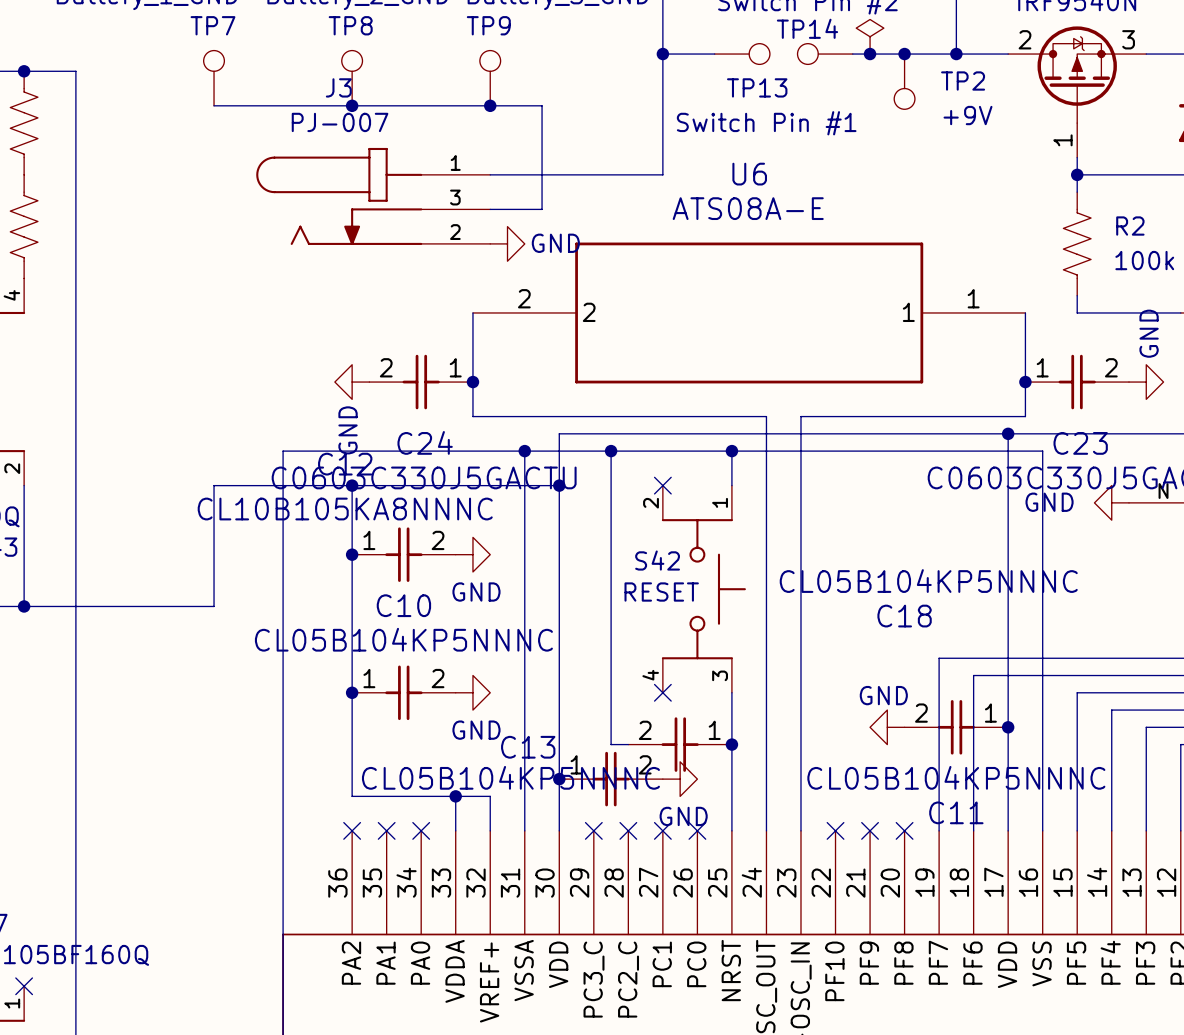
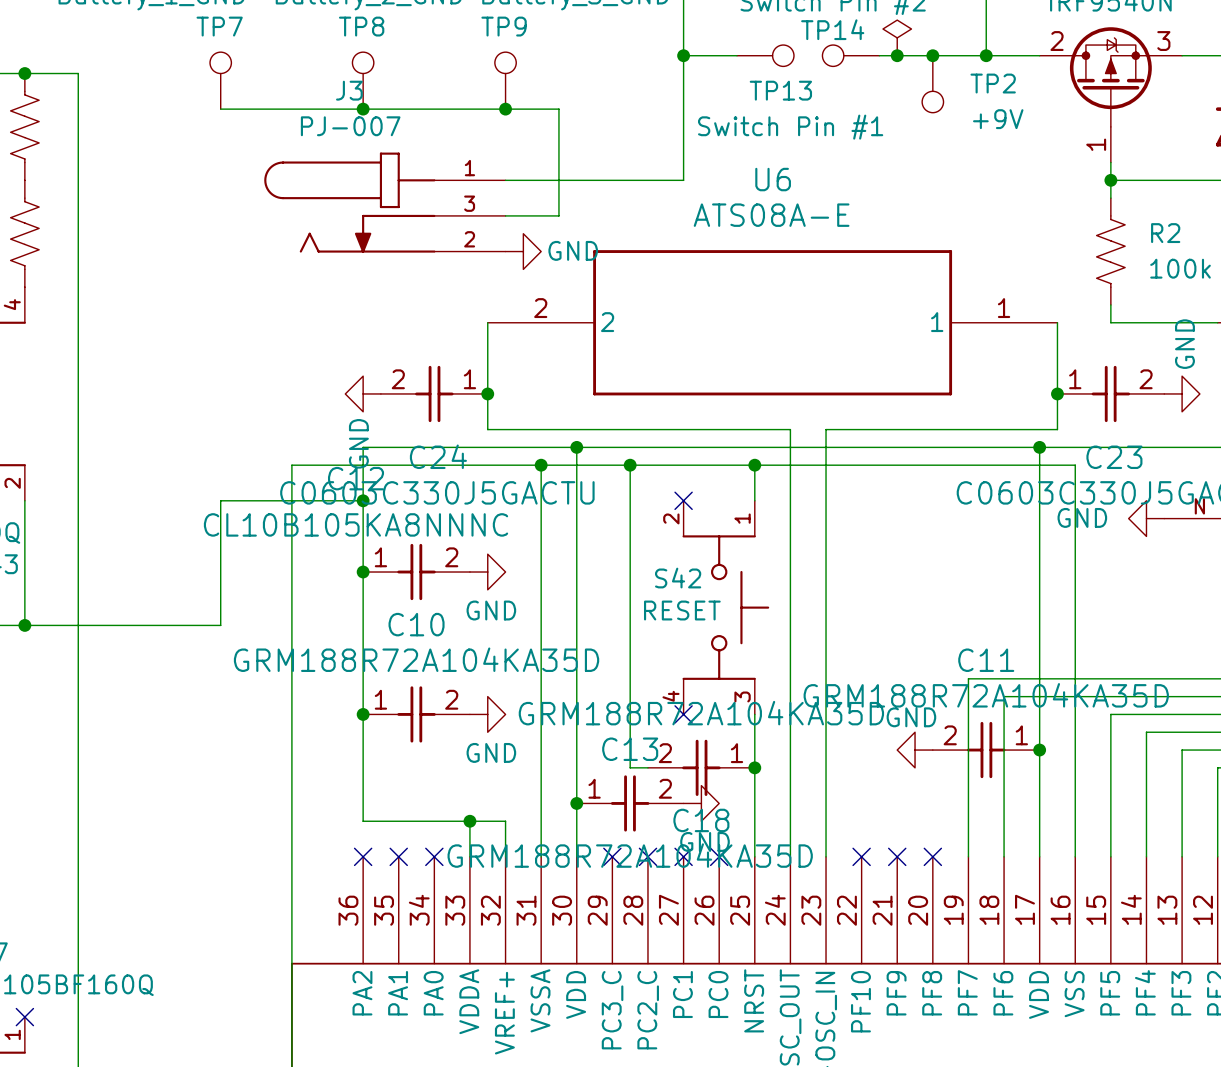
wire: (352, 485) (559, 485) -> (363, 500) (363, 447) (576, 447)
junction position: (559, 485) -> (576, 447)
C18 value: CL05B104KP5NNNC (928, 581) -> GRM188R72A104KA35D (701, 713)
C18 name position: C18 (904, 616) -> C18 (701, 820)
C10 value: CL05B104KP5NNNC (403, 639) -> GRM188R72A104KA35D (416, 659)
C13 name position: C13 (528, 747) -> C13 (630, 749)
C13 value: CL05B104KP5NNNC (510, 777) -> GRM188R72A104KA35D (630, 855)
C11 value: CL05B104KP5NNNC (956, 777) -> GRM188R72A104KA35D (986, 695)
C11 name position: C11 (956, 812) -> C11 (986, 660)

